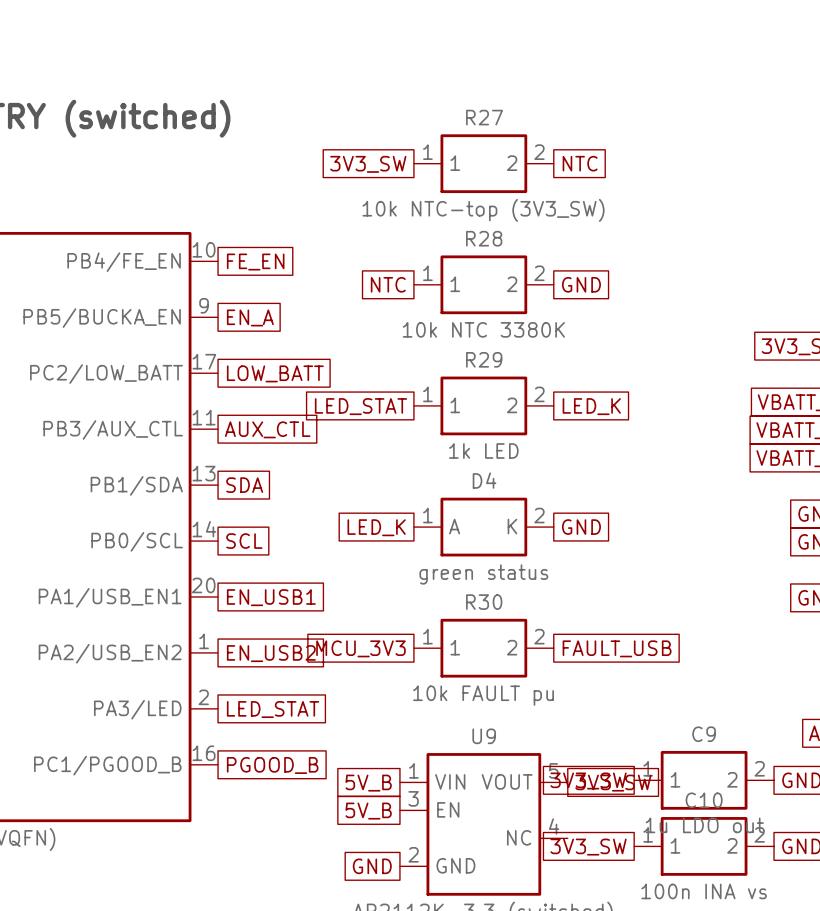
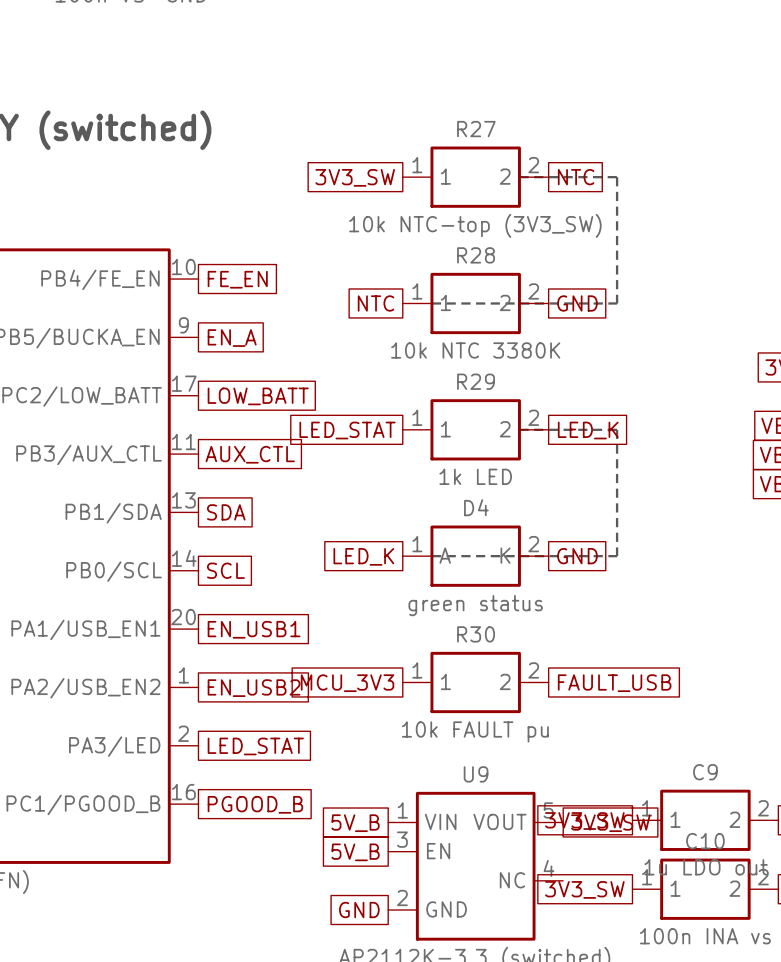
line: none -> (519, 177) (617, 177) (617, 303) (431, 303)
line: none -> (519, 429) (617, 429) (617, 556) (431, 556)

